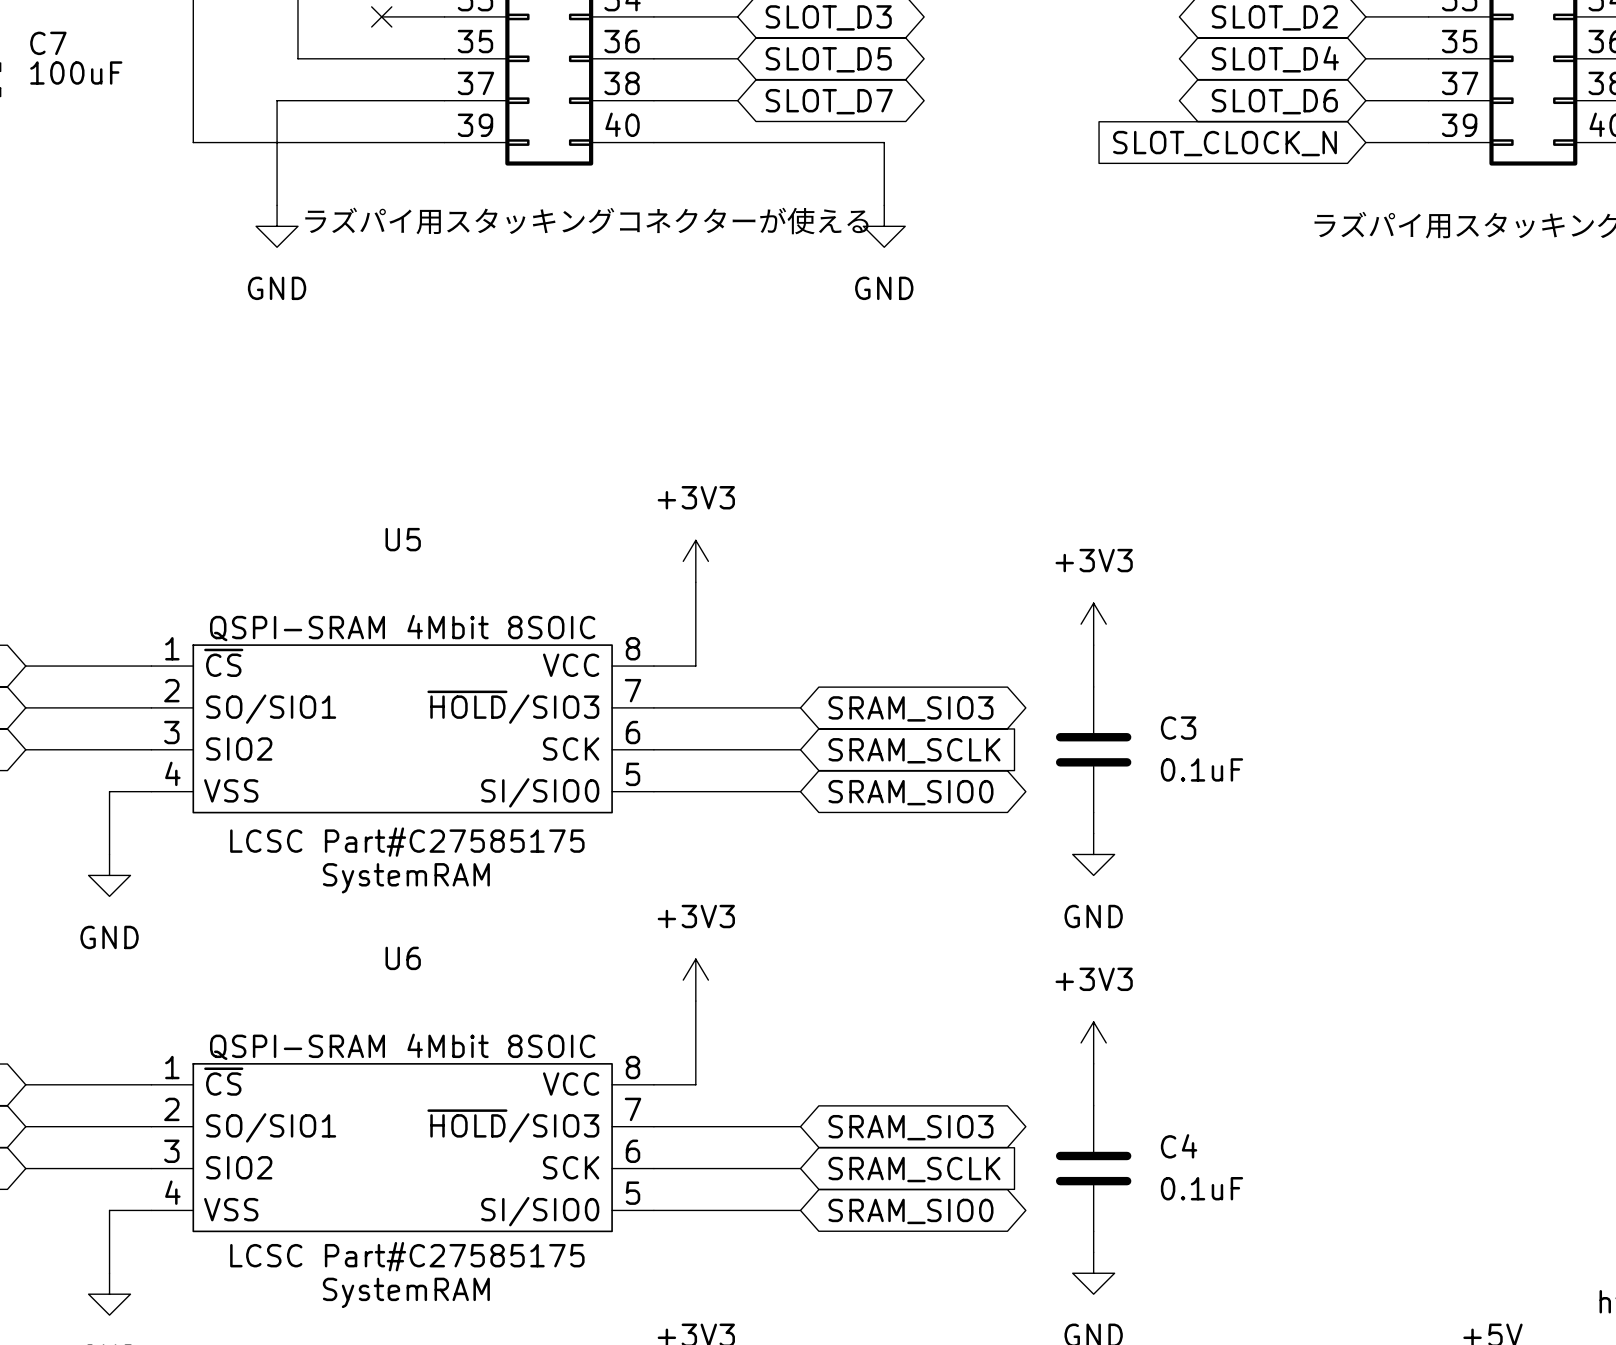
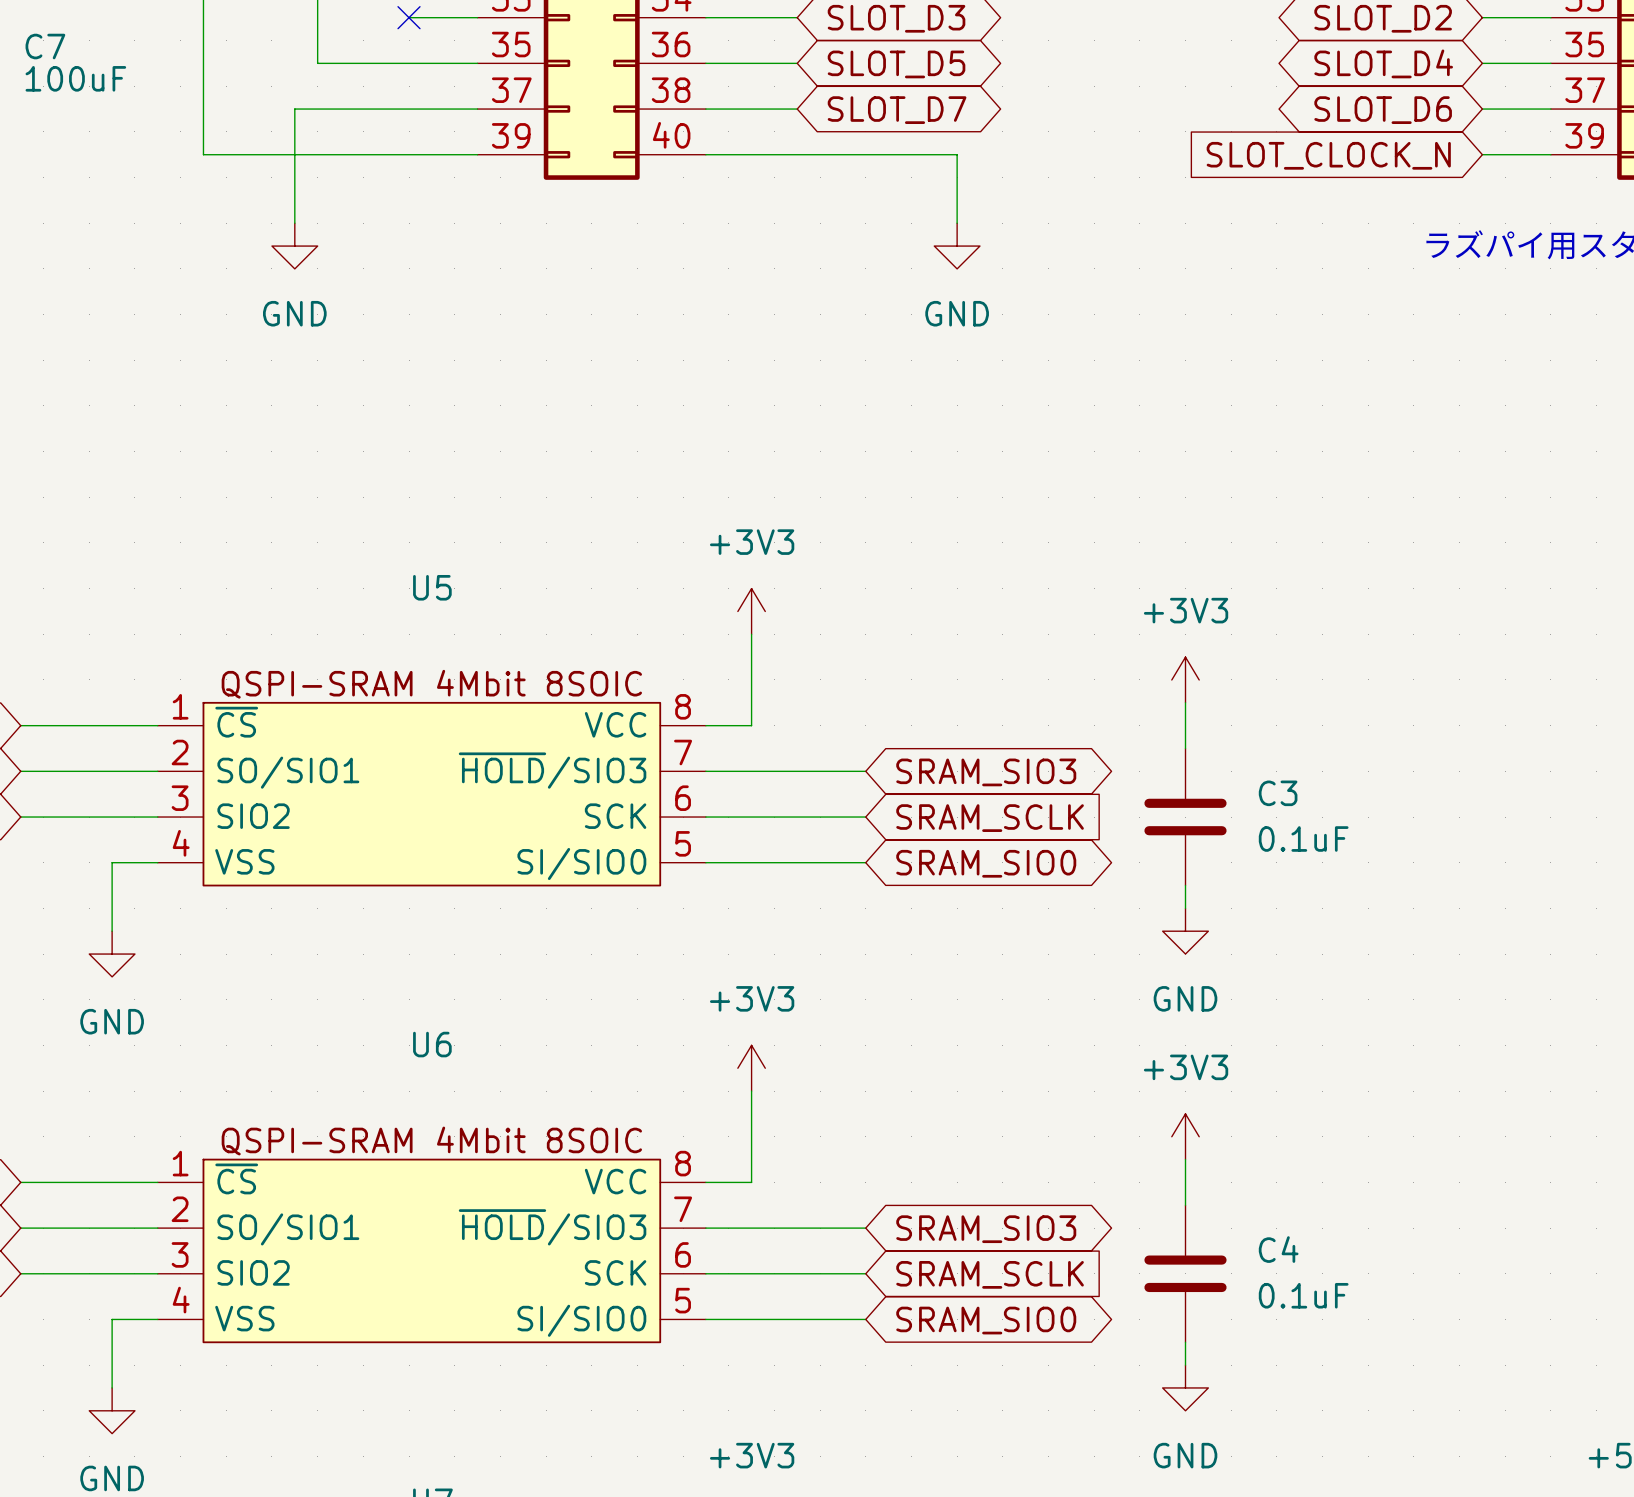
text: ラズパイ用スタッキングコネクターが使える (586, 220) -> none
text: LCSC Part#C27585175 (407, 842) -> none
text: SystemRAM (406, 878) -> none
text: LCSC Part#C27585175 (407, 1256) -> none
text: SystemRAM (406, 1292) -> none

